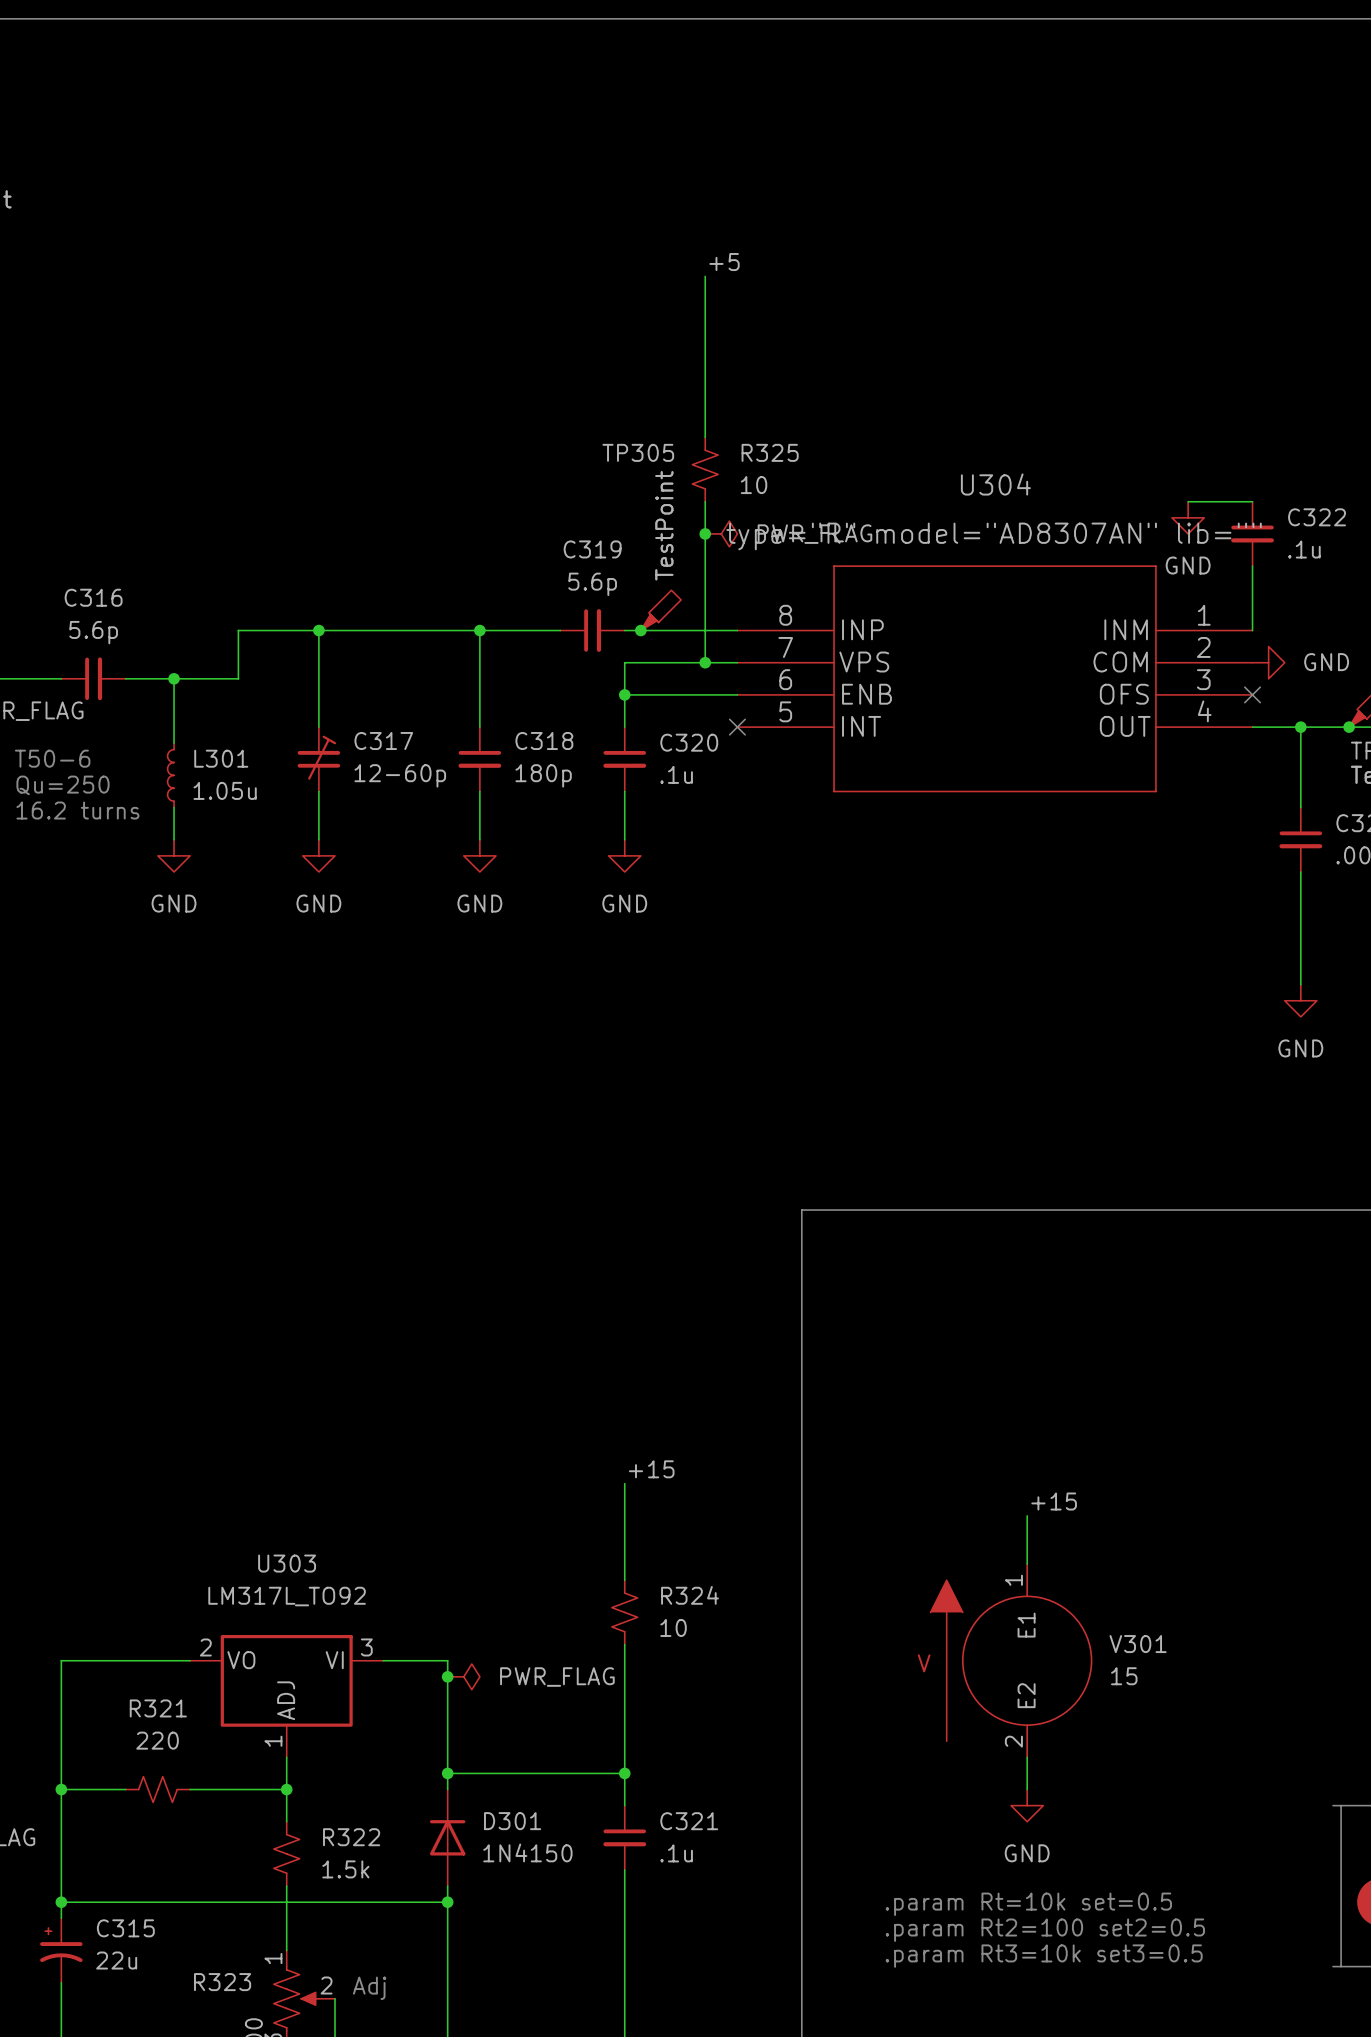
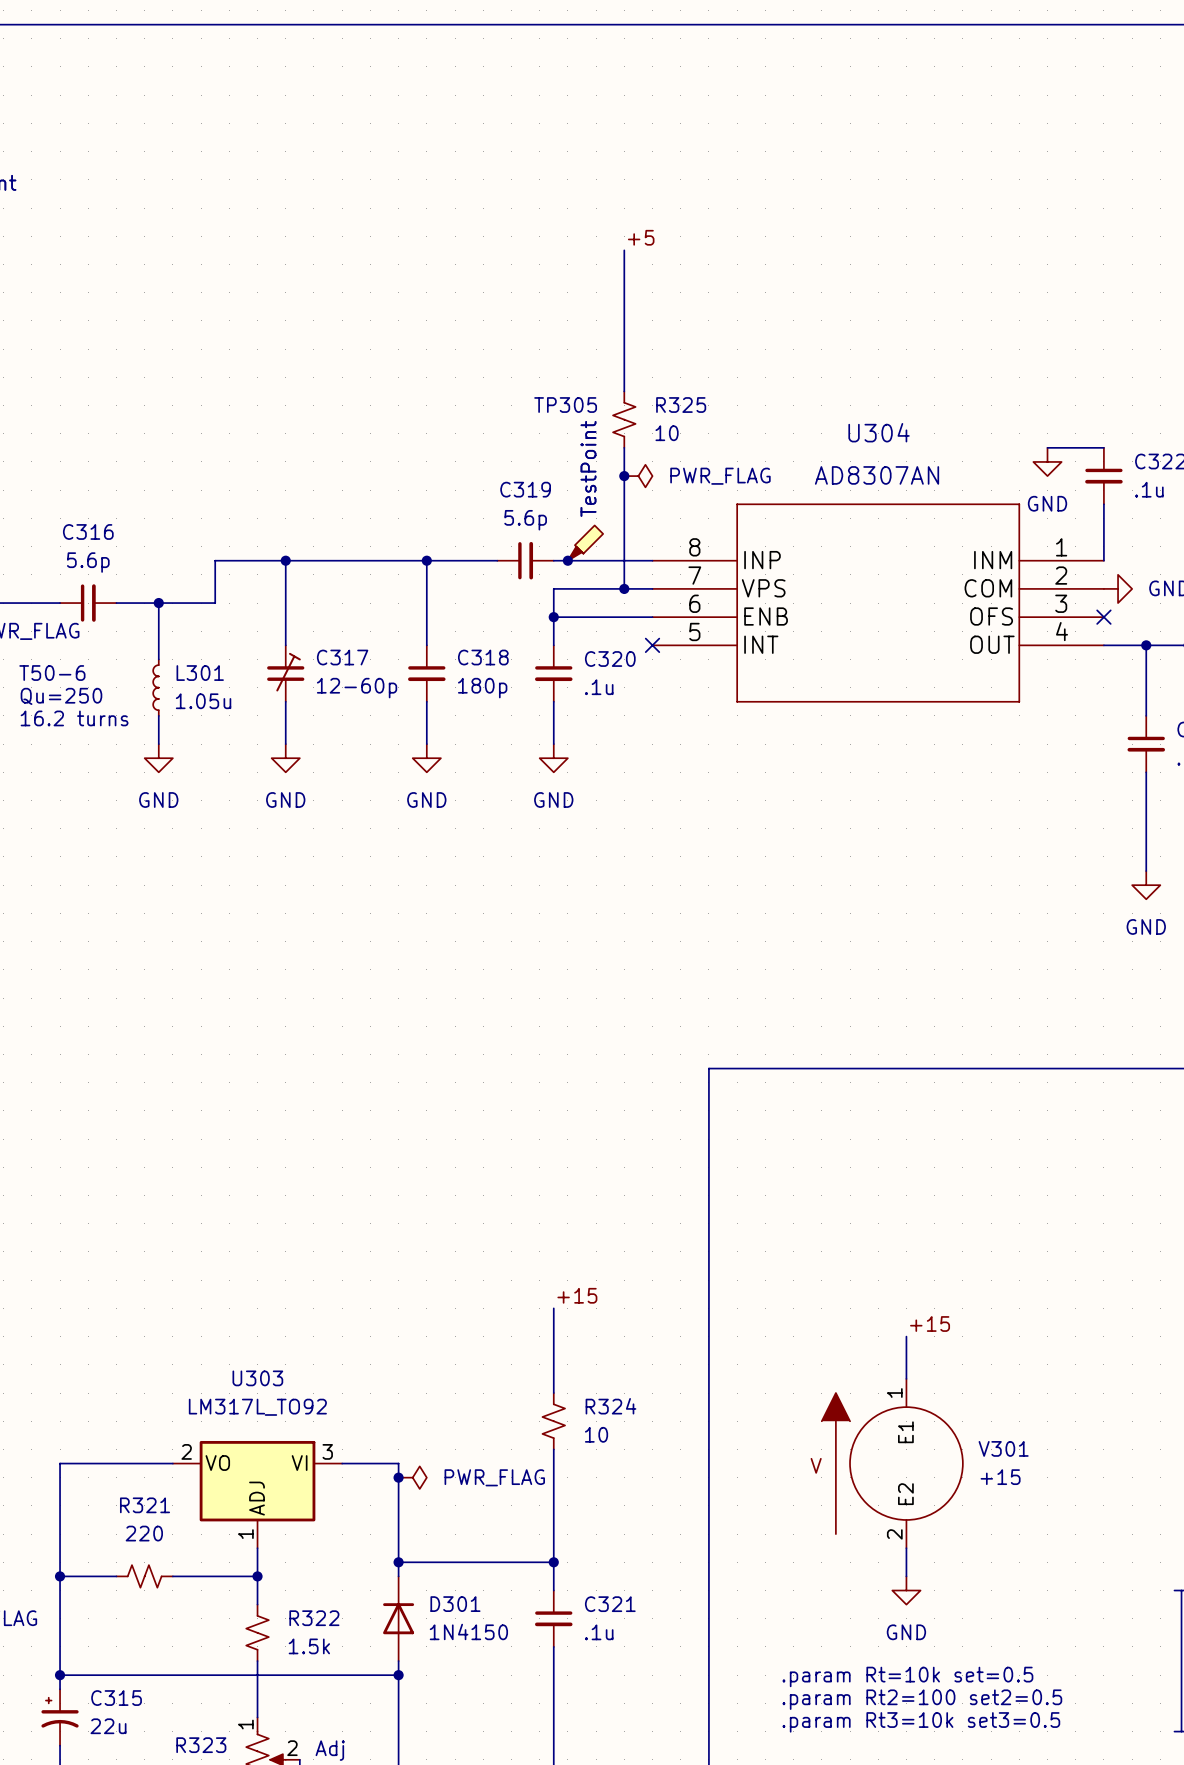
U304 value: type="R" model="AD8307AN" lib="" (994, 536) -> AD8307AN (877, 475)
V301 value: 15 (1124, 1676) -> +15 (1000, 1477)

